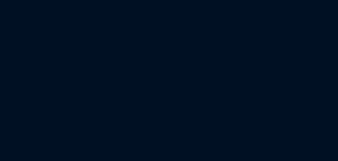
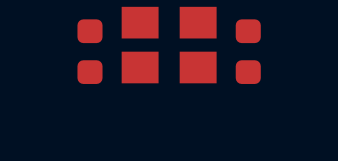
part: none -> (169, 45)
part: none -> (89, 51)
part: none -> (248, 51)

